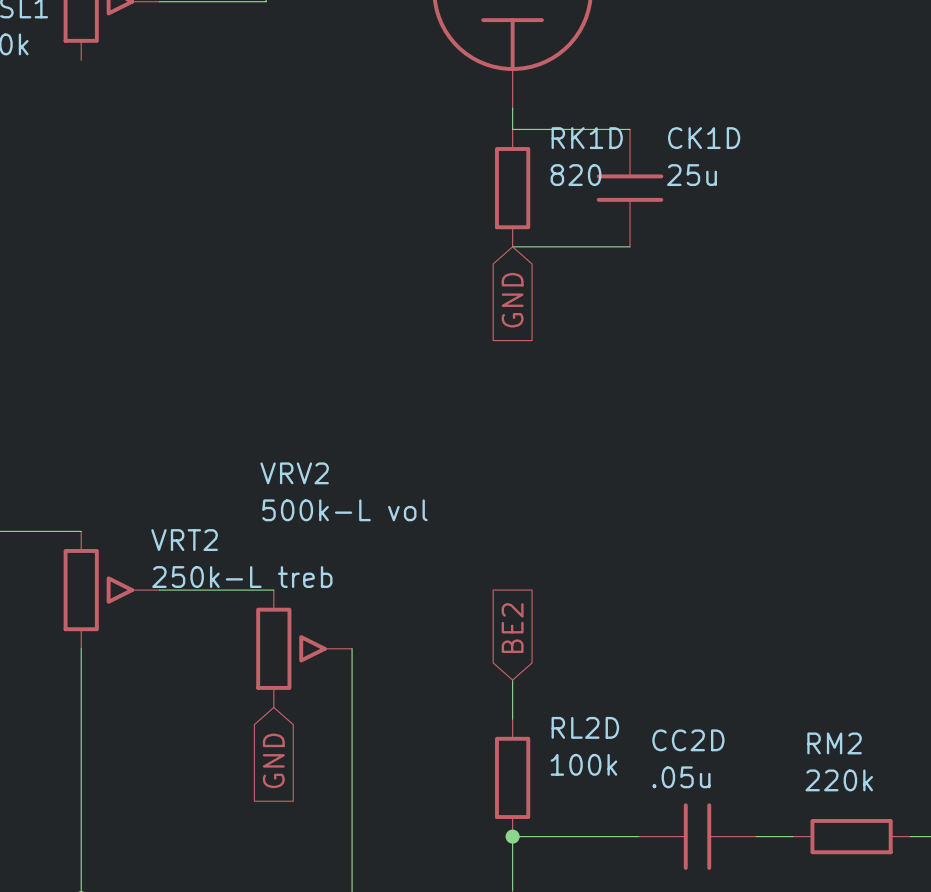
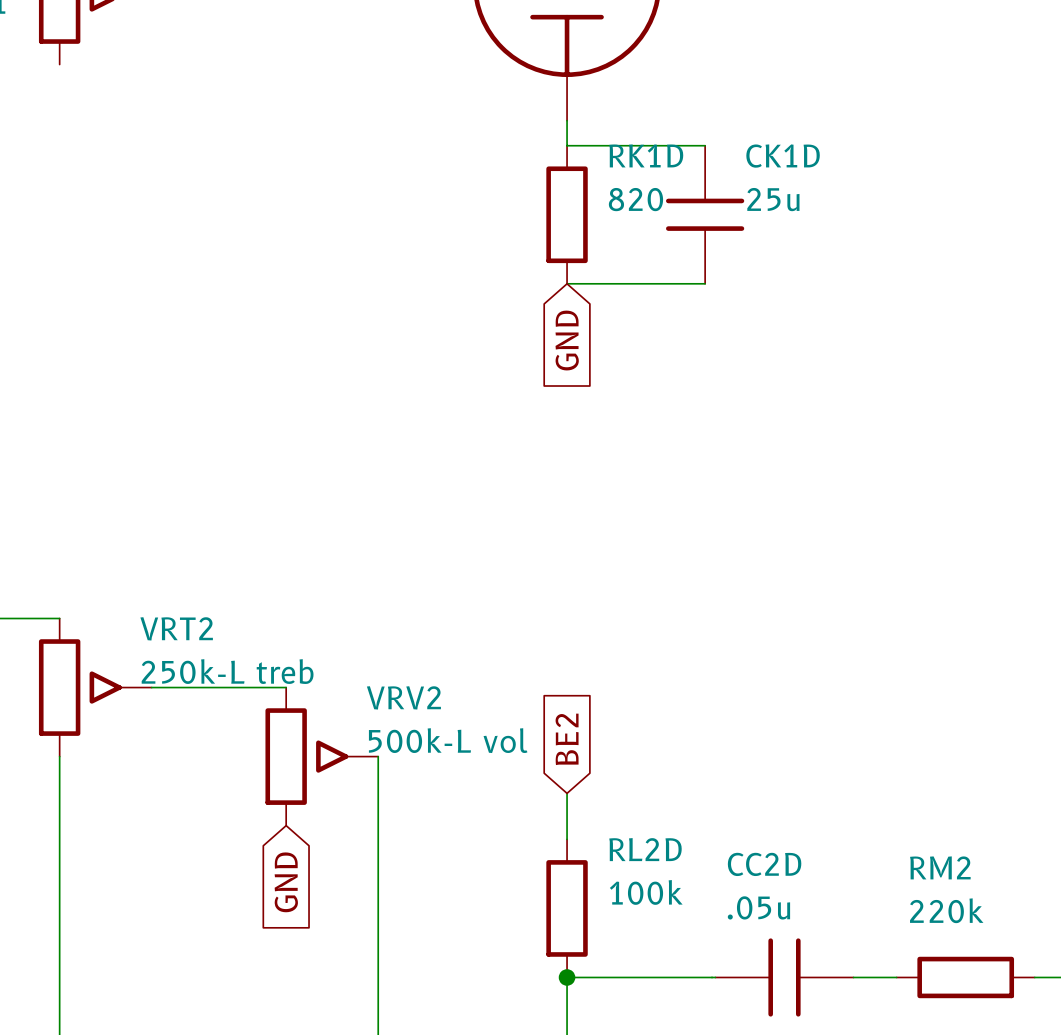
VRV2 name position: VRV2 (294, 473) -> VRV2 (403, 697)
VRV2 value position: 500k-L vol (344, 510) -> 500k-L vol (448, 740)

